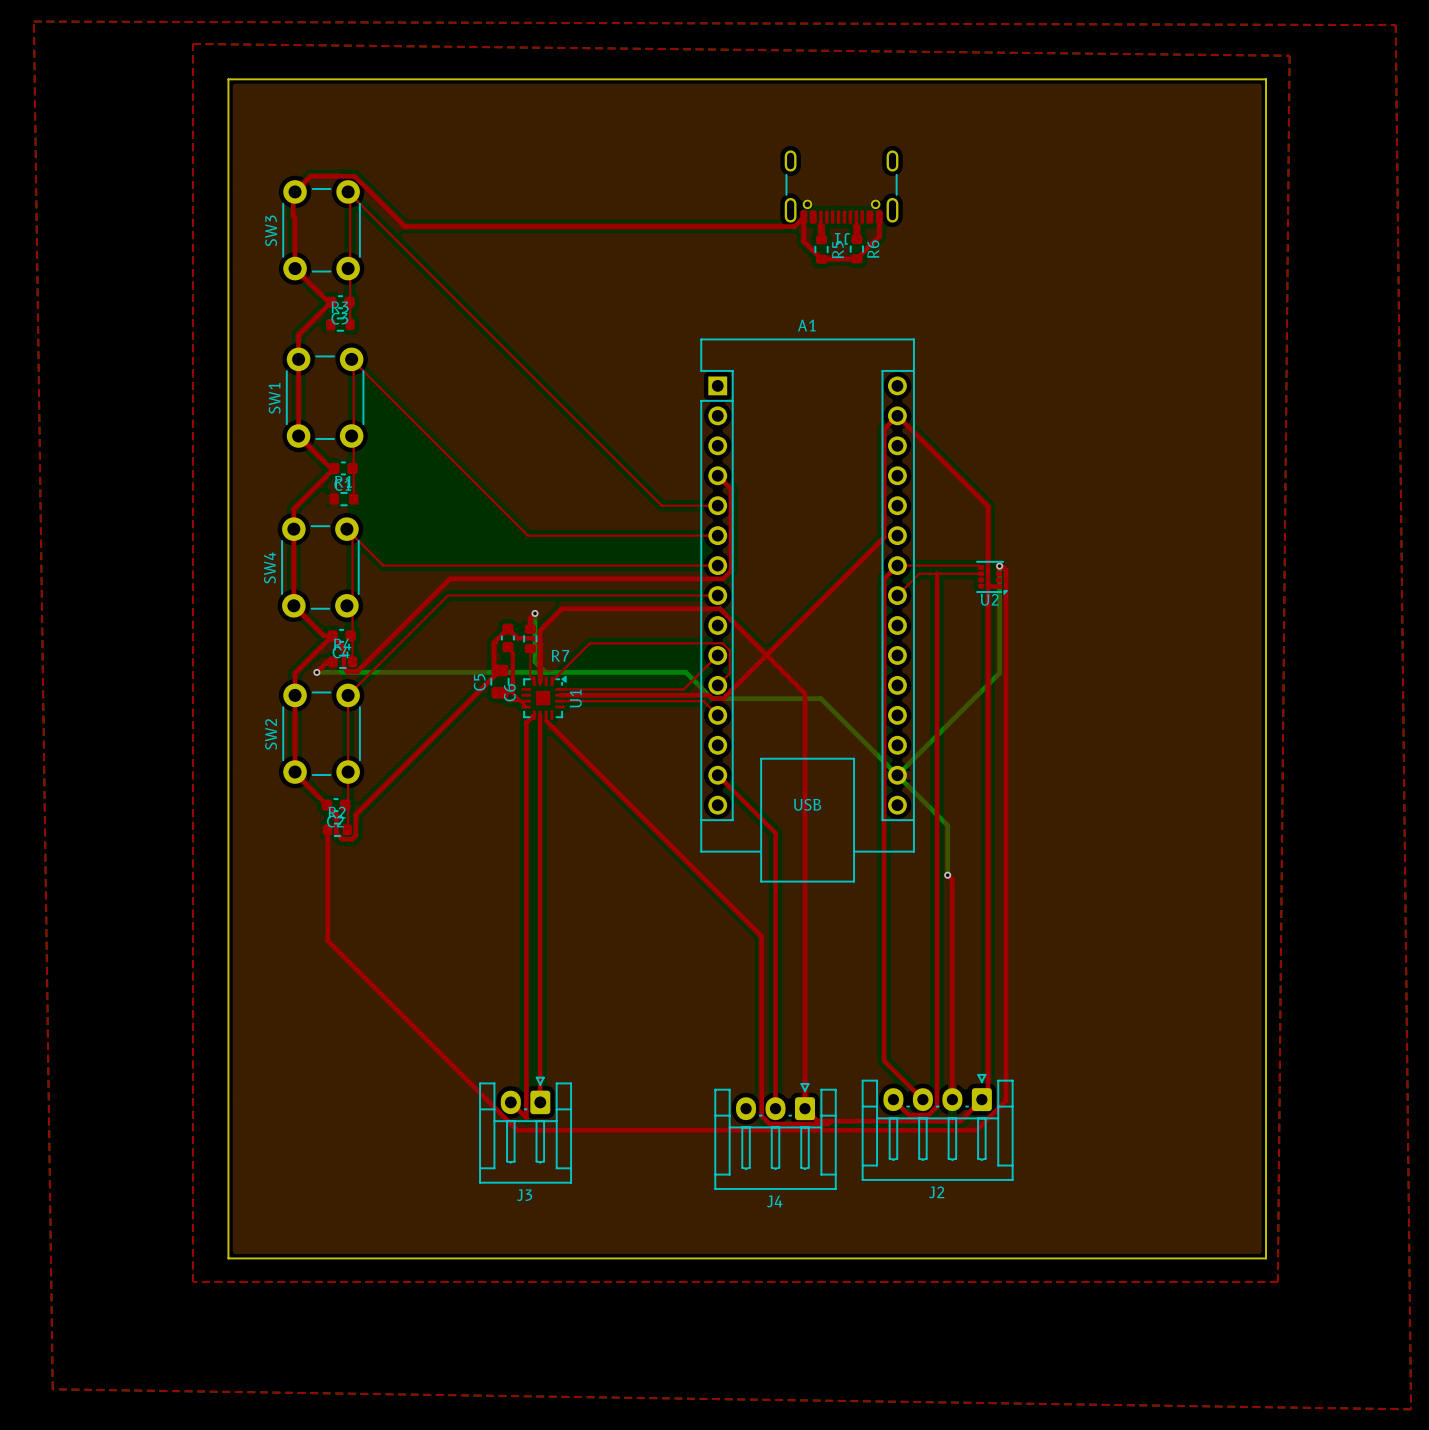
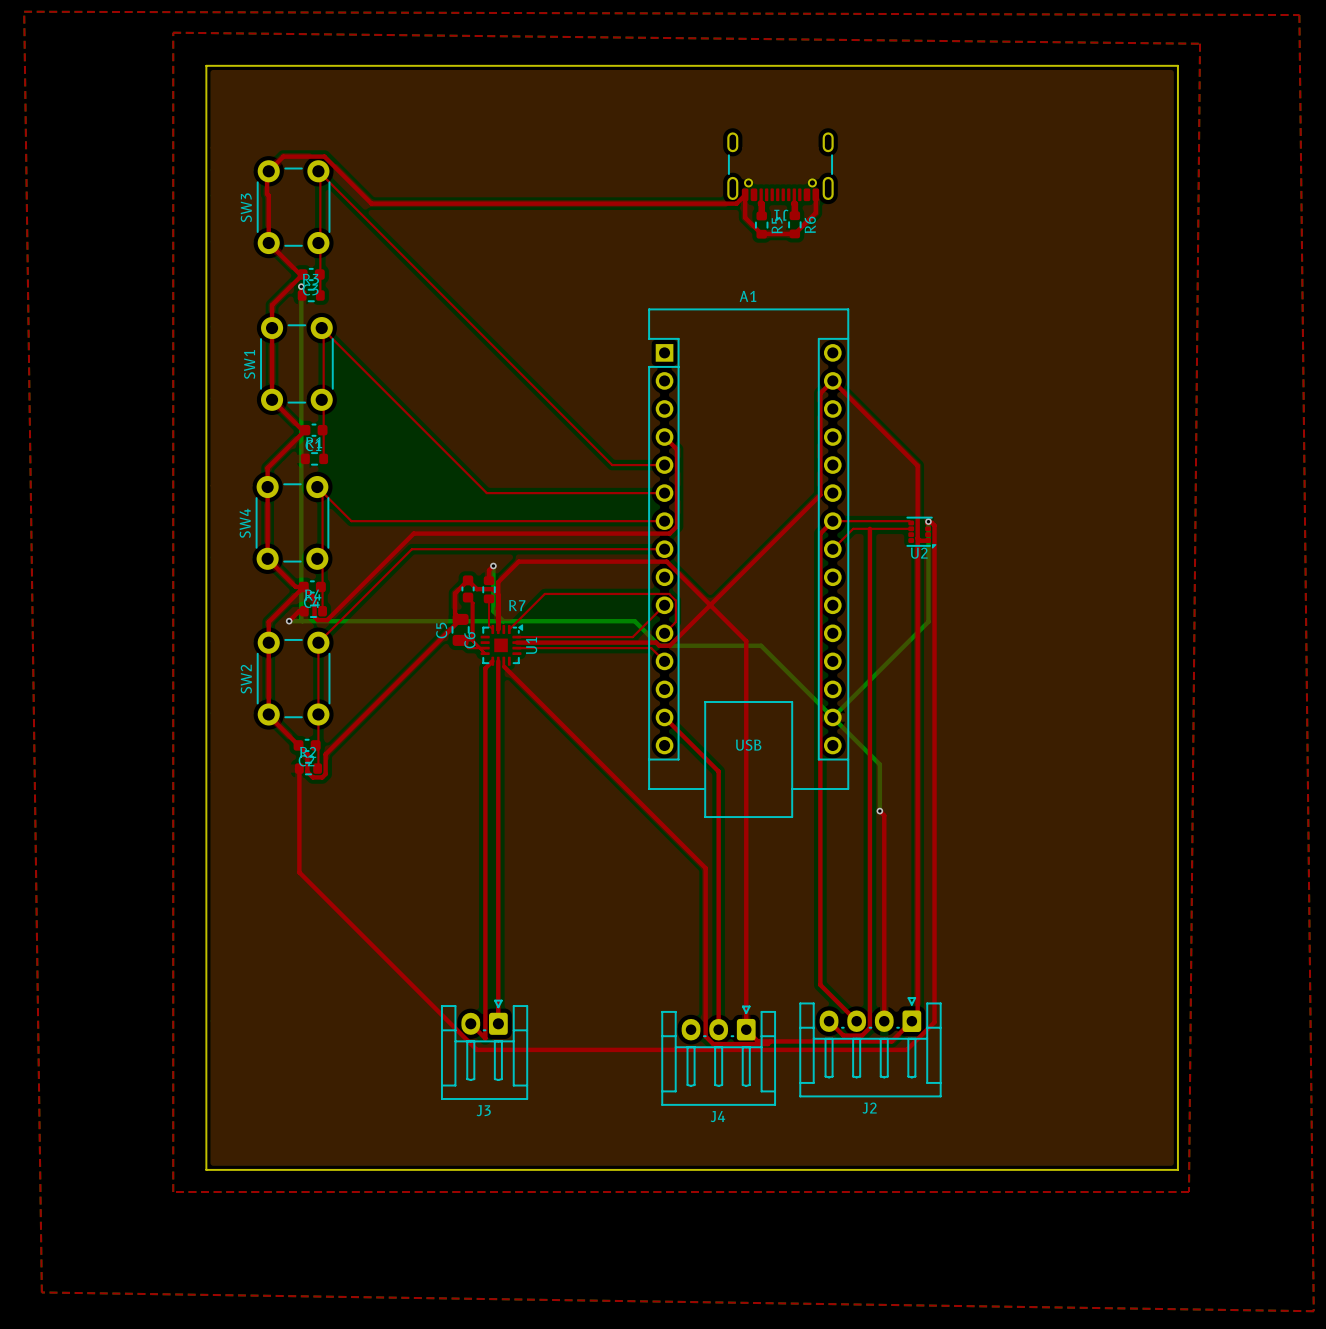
bottom track: none -> (301, 286) (302, 621)
via: none -> (301, 286)

